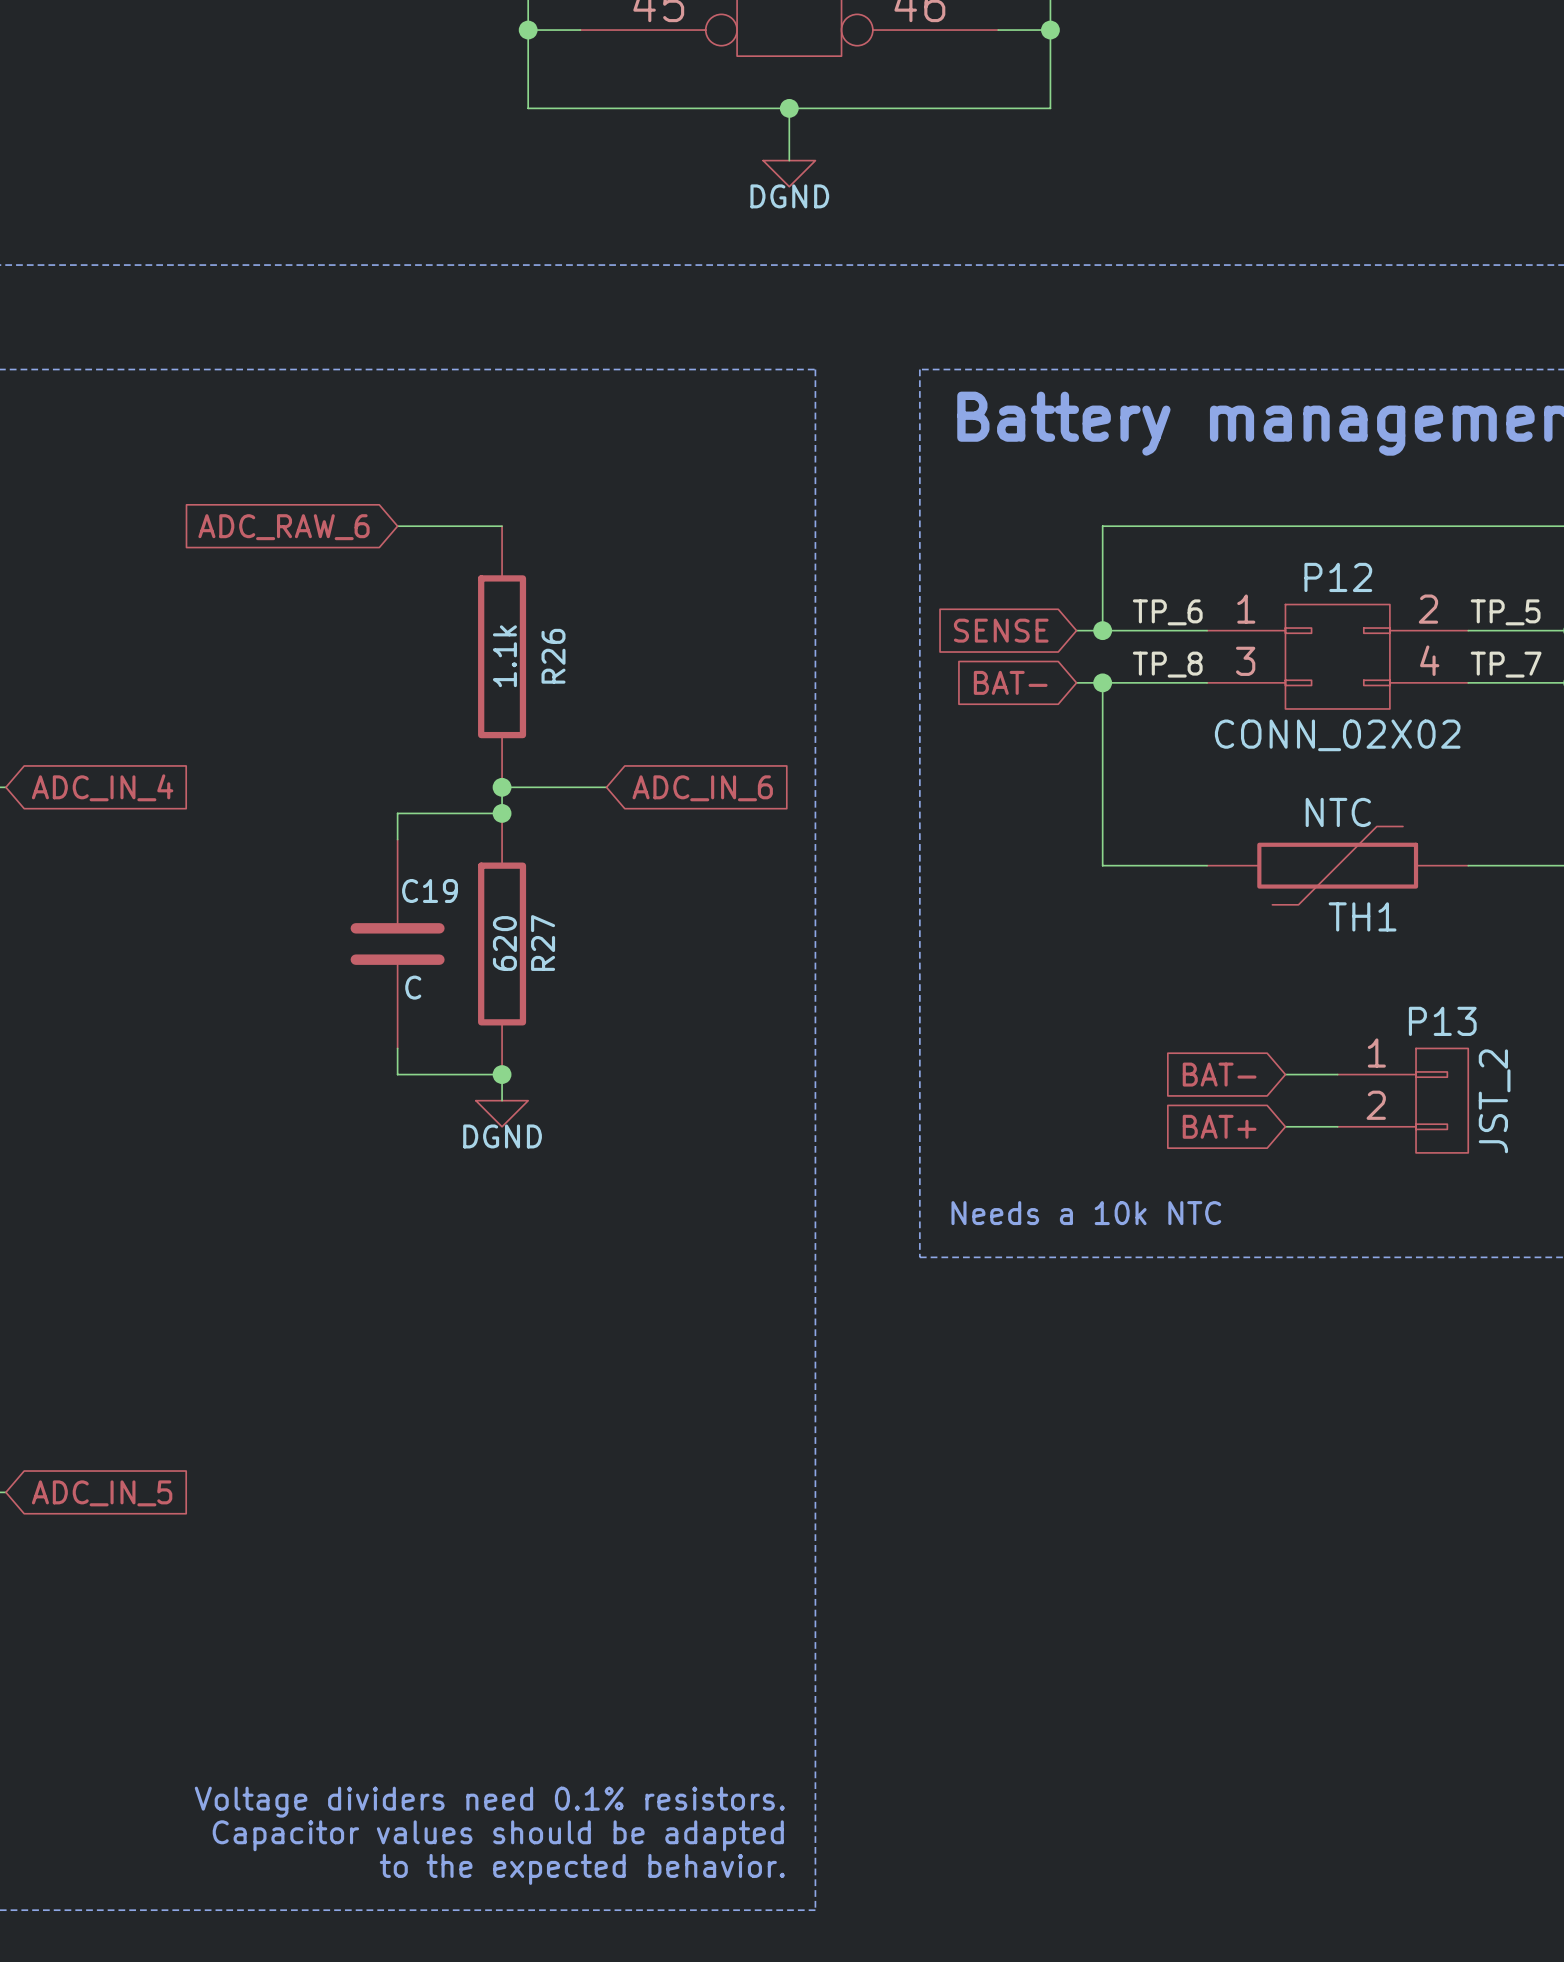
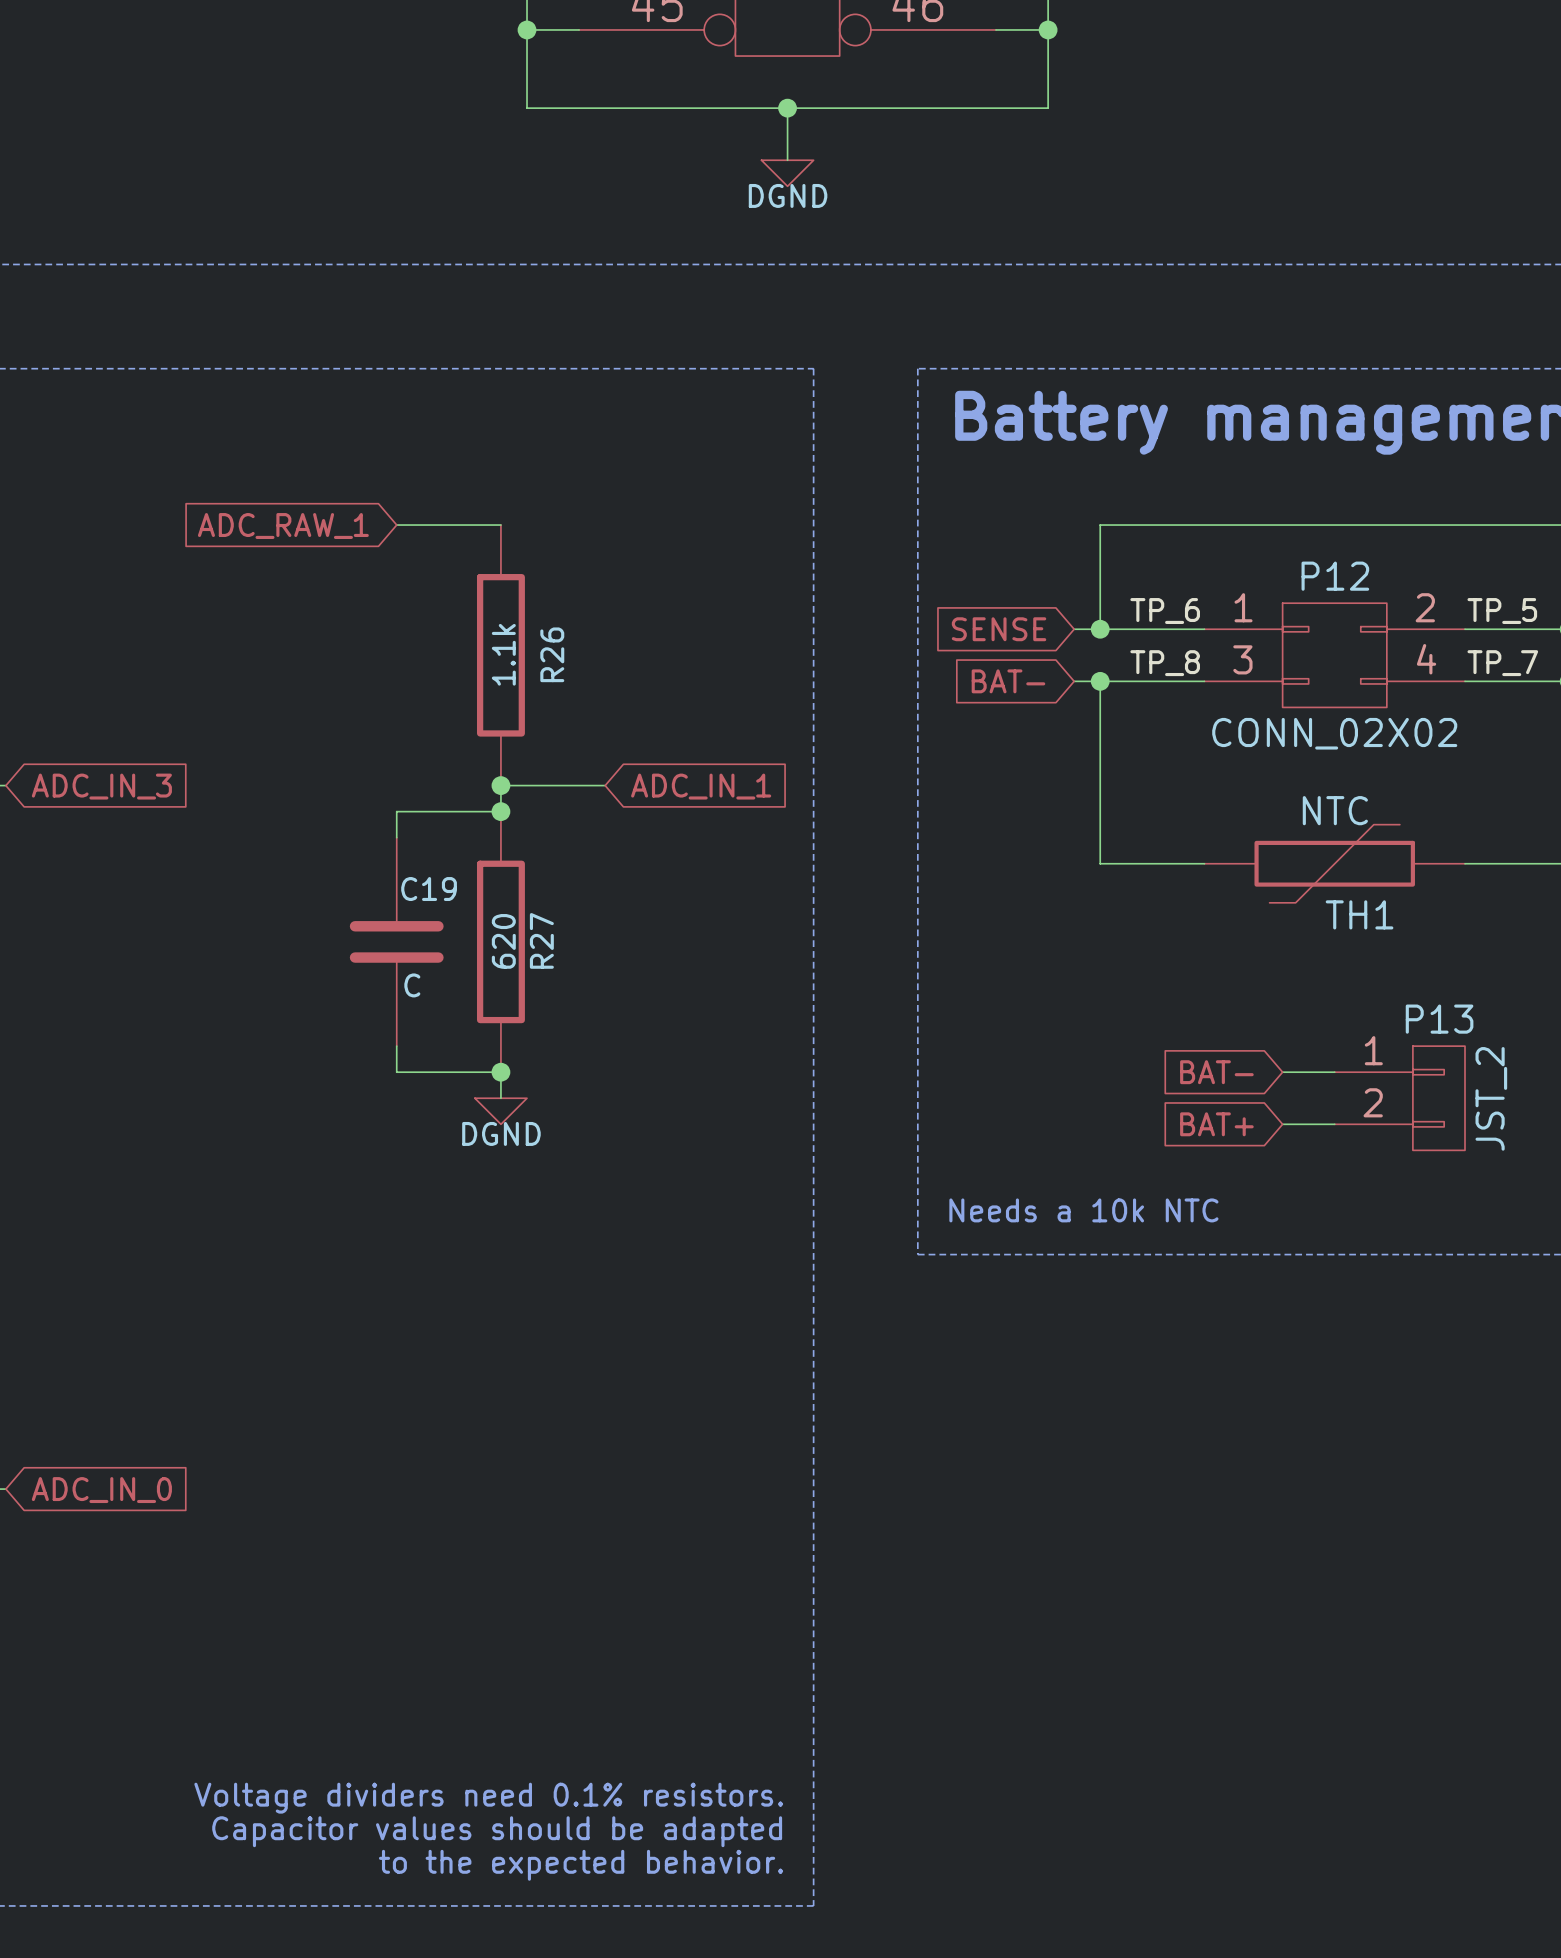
global label: ADC_RAW_6 (284, 527) -> ADC_RAW_1 (283, 526)
global label: ADC_IN_4 (102, 787) -> ADC_IN_3 (101, 786)
global label: ADC_IN_6 (702, 788) -> ADC_IN_1 (701, 786)
global label: ADC_IN_5 (102, 1493) -> ADC_IN_0 (101, 1490)

